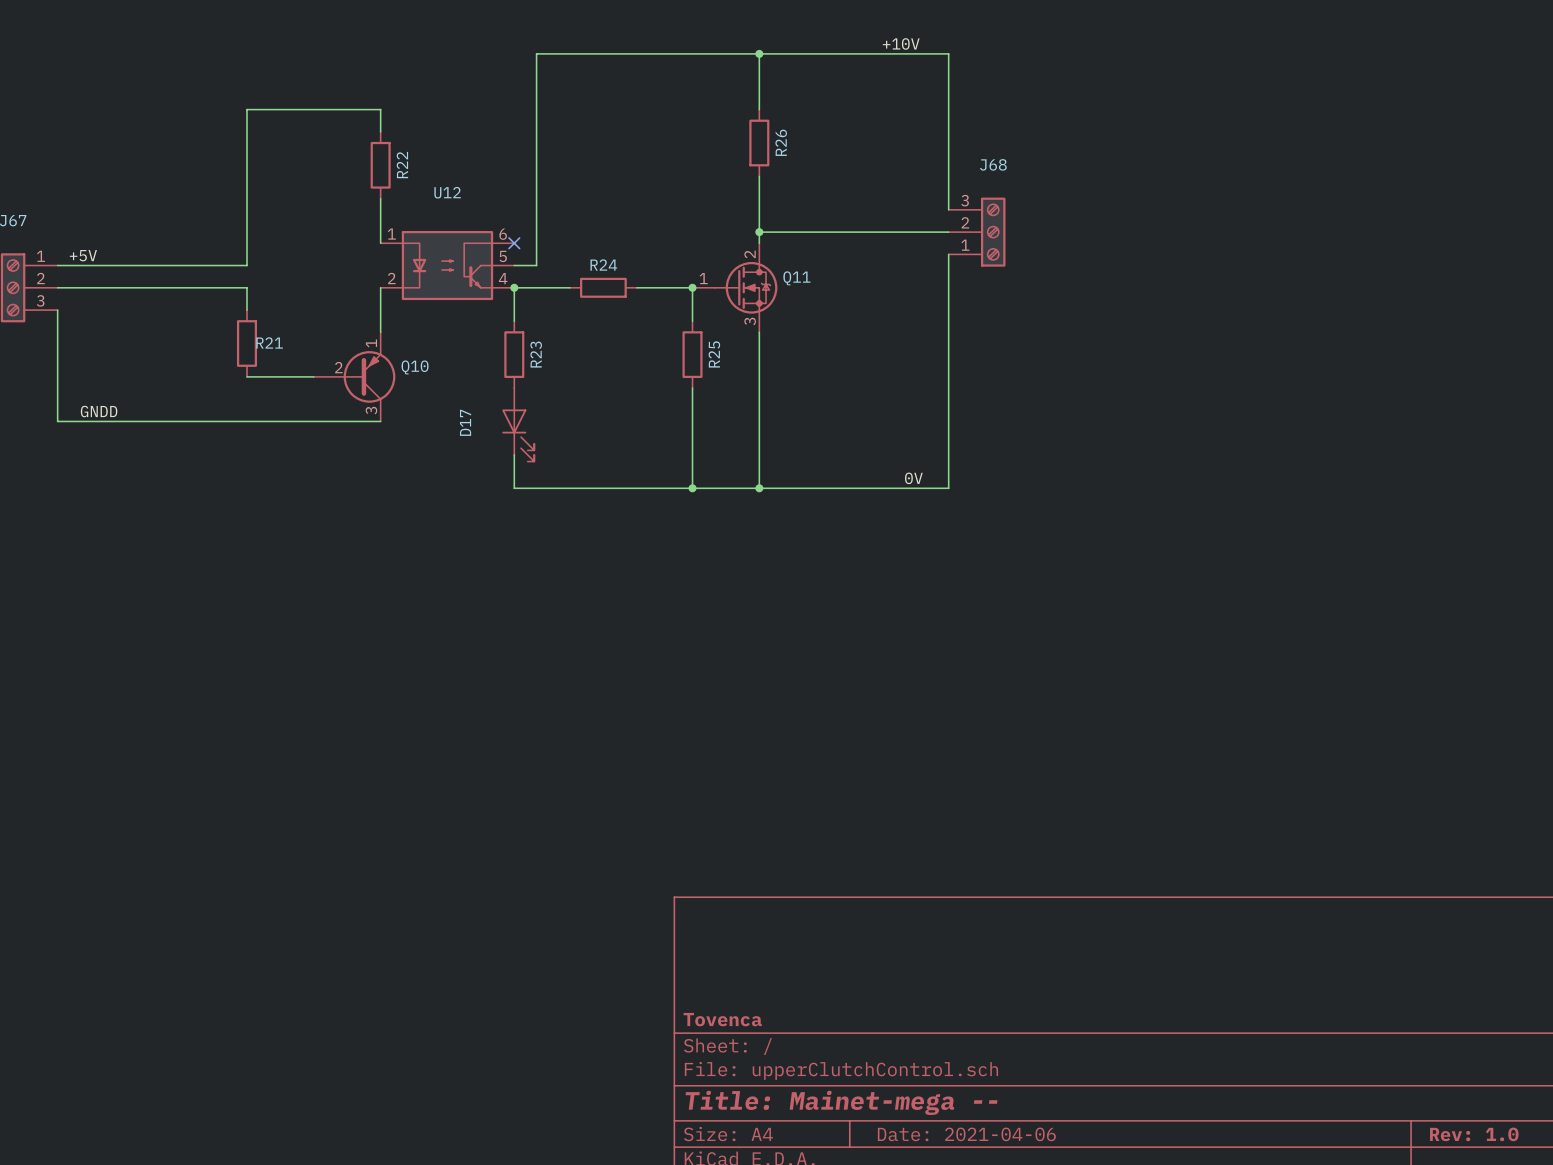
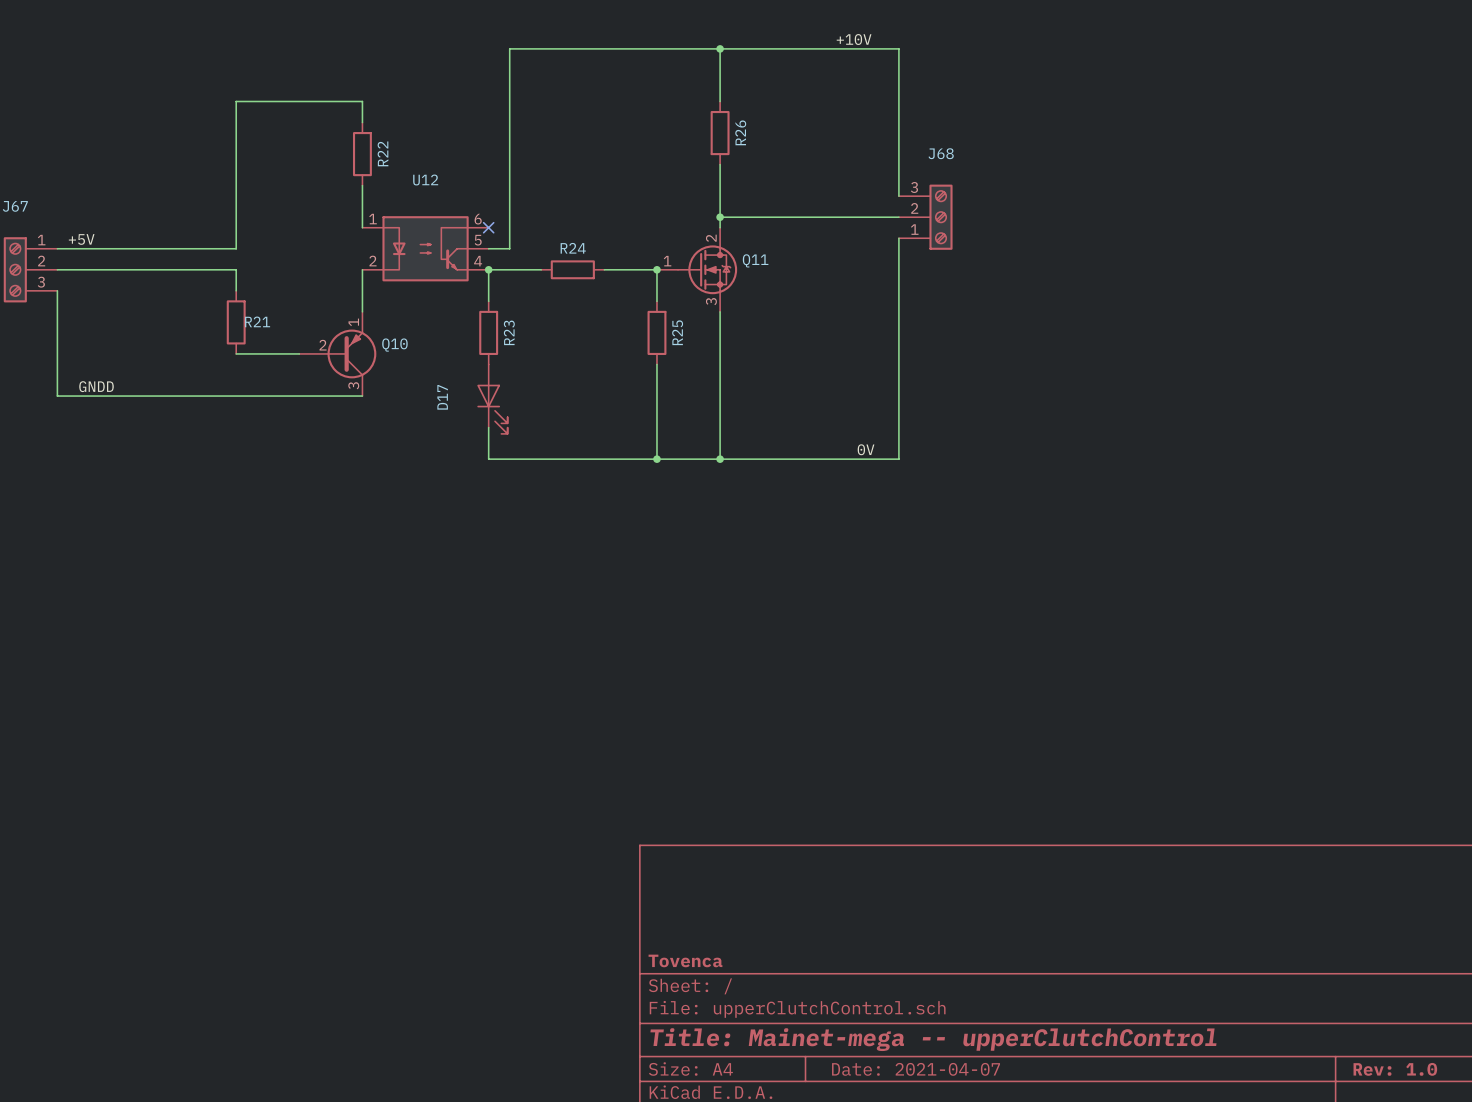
title block: Title: Mainet-mega -- (841, 1102) -> Title: Mainet-mega -- upperClutchControl (933, 1039)
title block: Date: 2021-04-06 (966, 1134) -> Date: 2021-04-07 (916, 1069)

